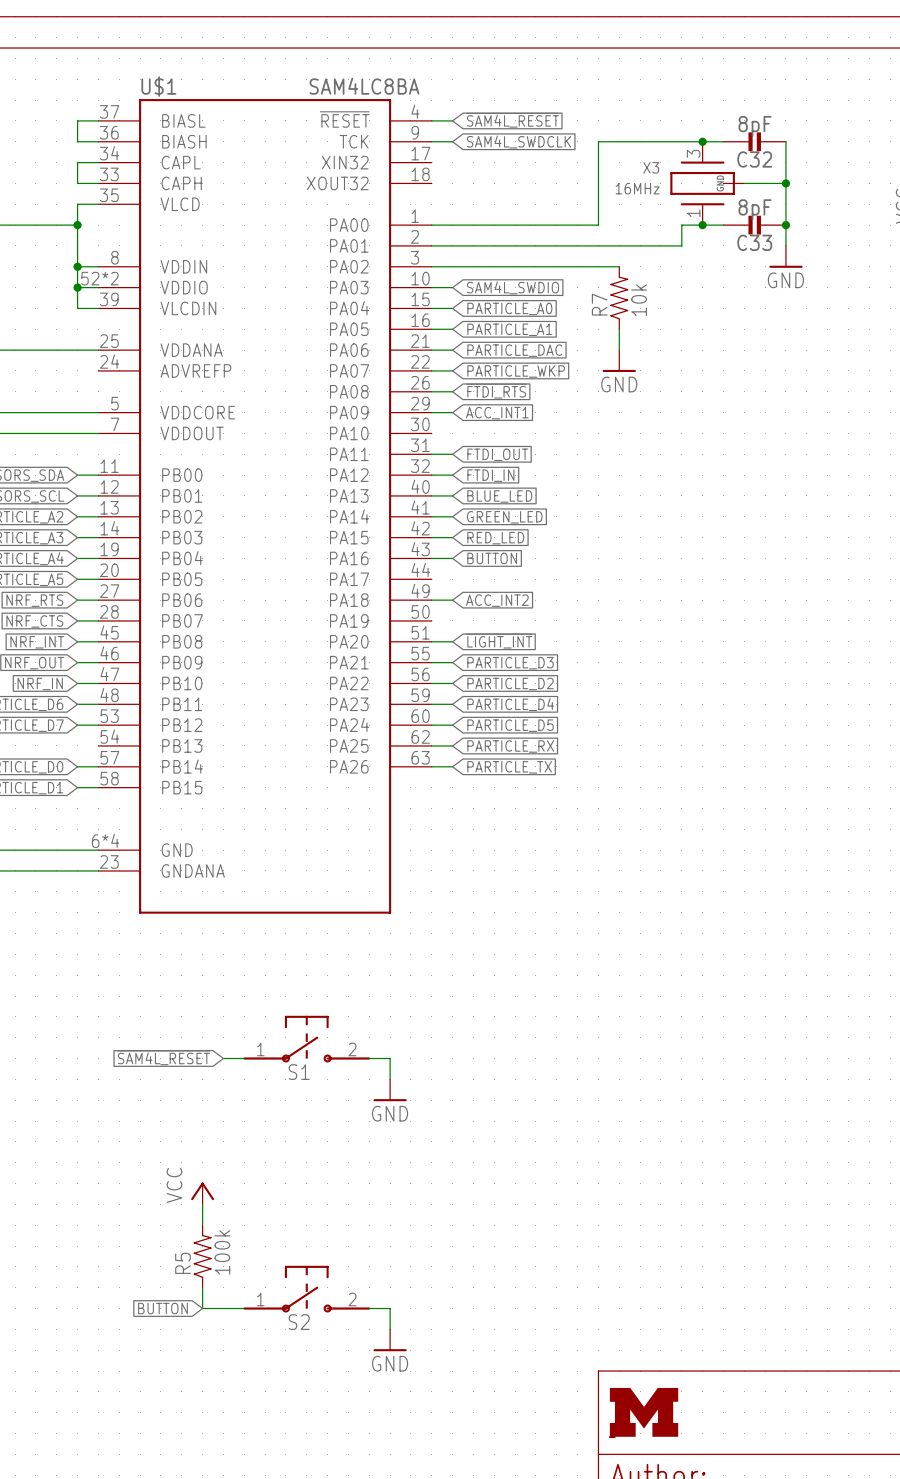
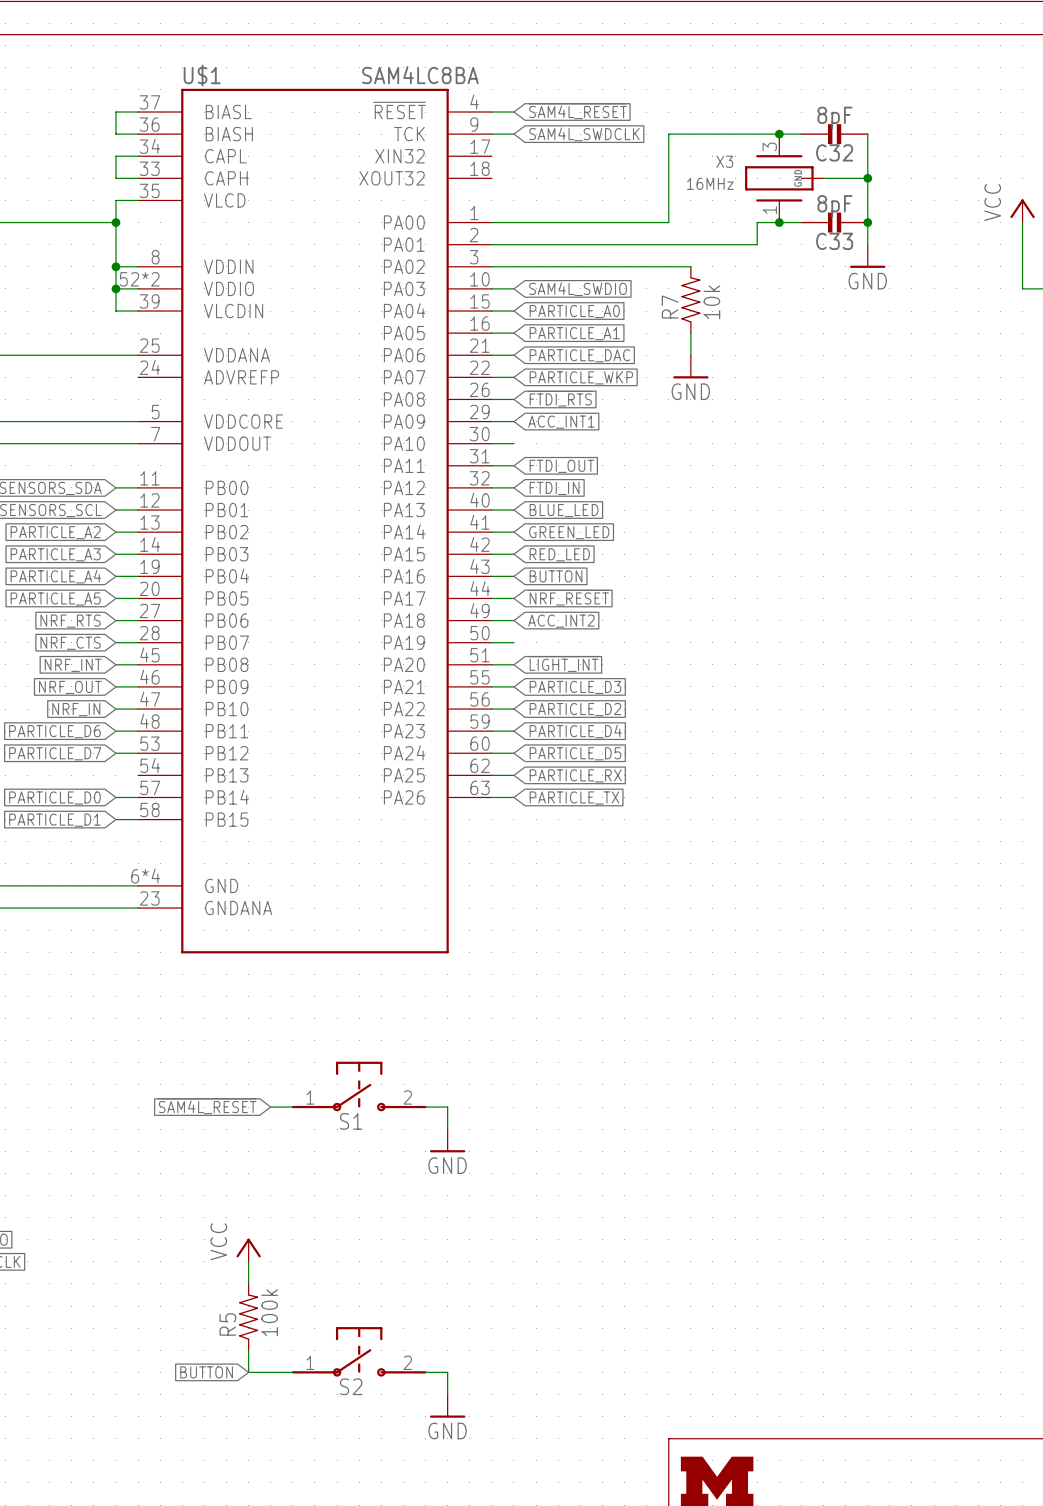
wire: none -> (491, 443) (513, 443)
global label: none -> ~{NRF_RESET} (568, 597)
wire: none -> (491, 598) (513, 598)
wire: none -> (491, 642) (513, 642)

